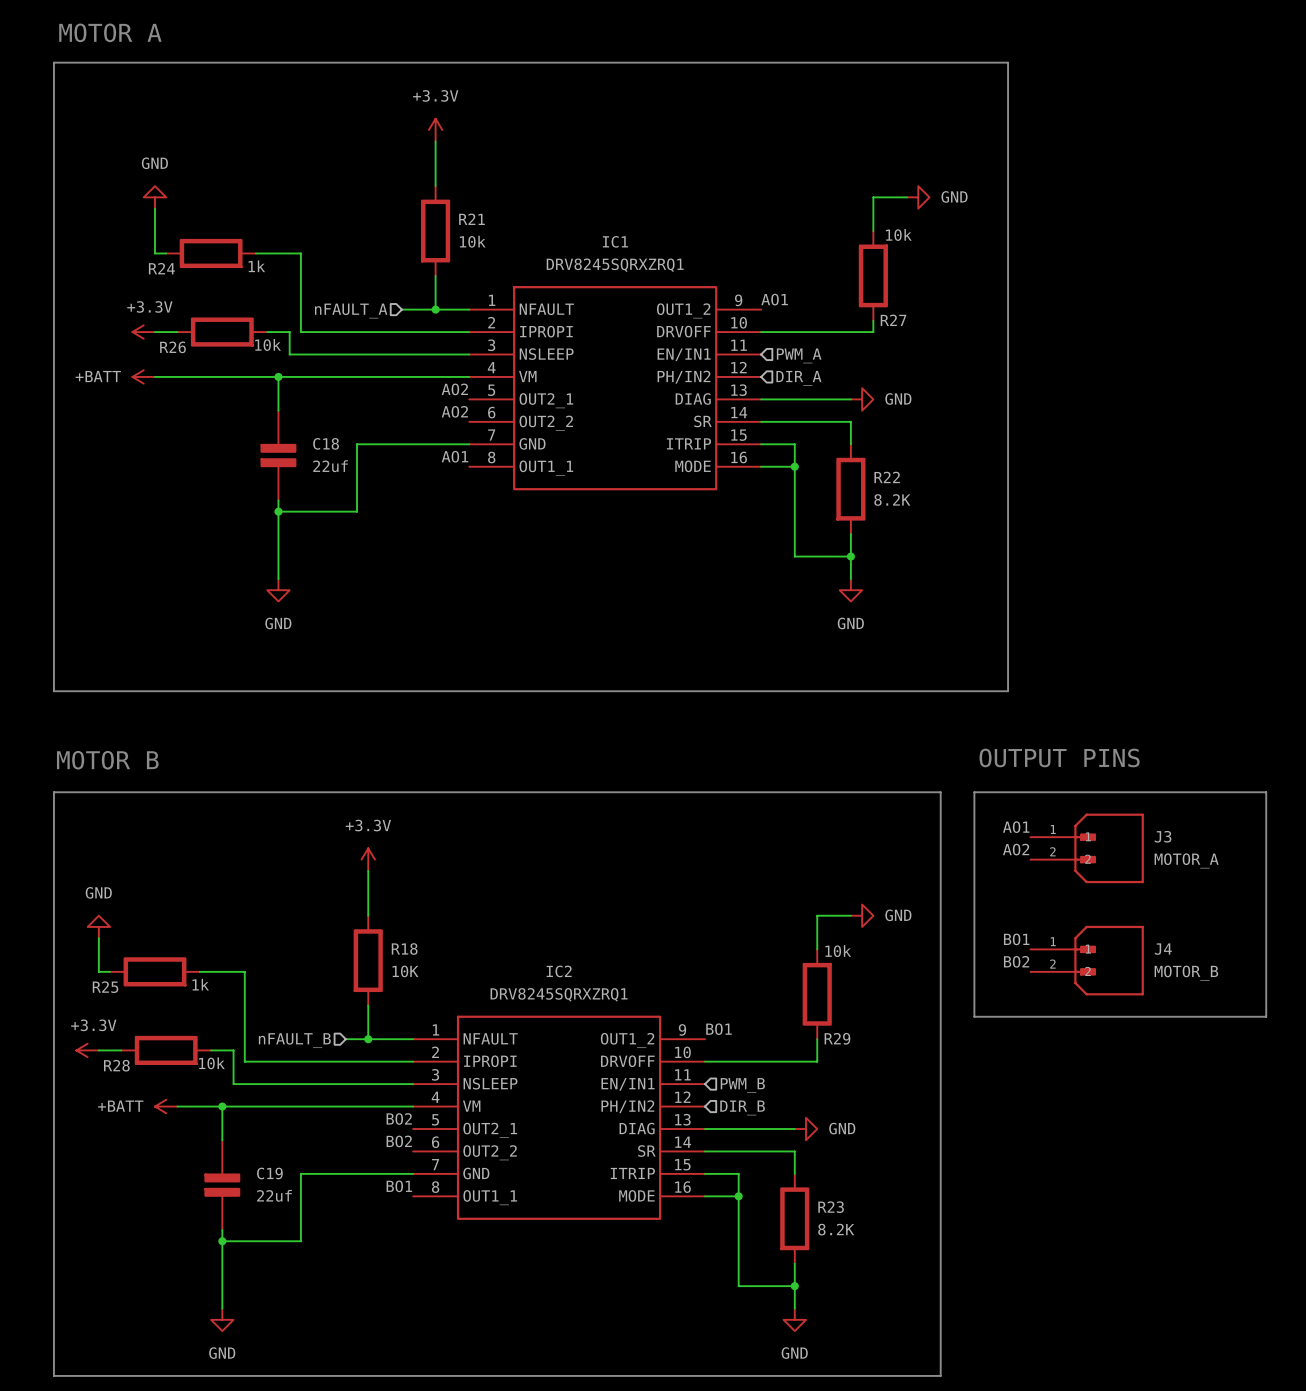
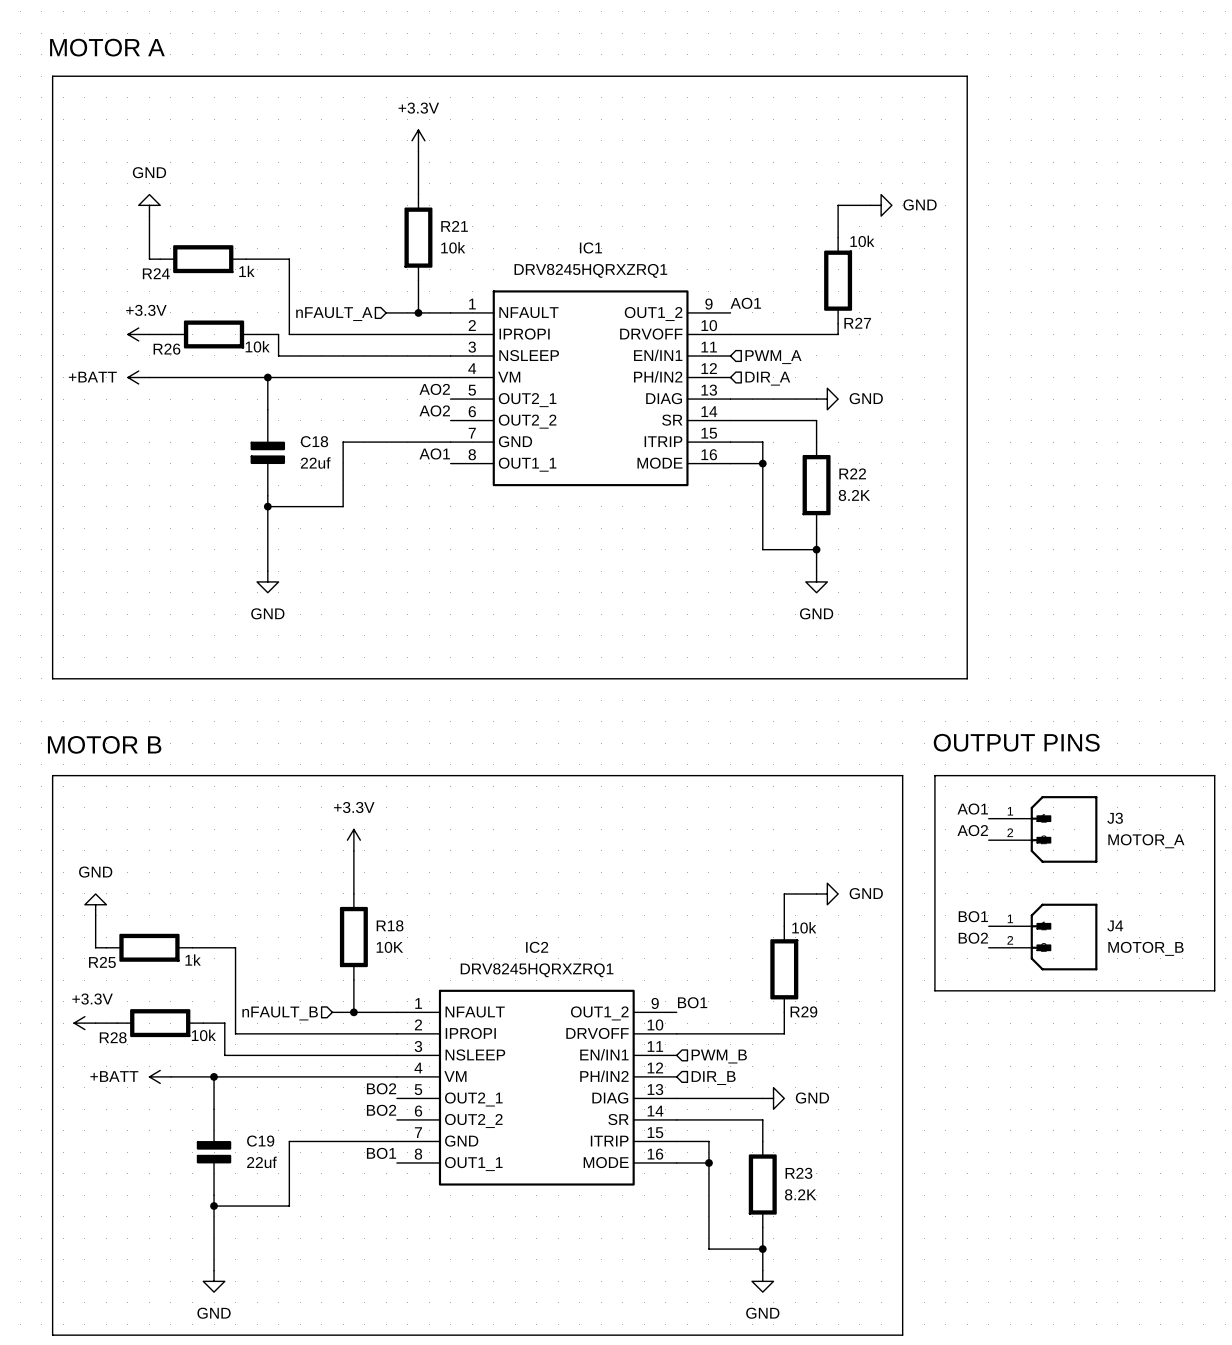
IC1 value: DRV8245SQRXZRQ1 (615, 265) -> DRV8245HQRXZRQ1 (590, 270)
IC2 value: DRV8245SQRXZRQ1 (559, 994) -> DRV8245HQRXZRQ1 (537, 970)

